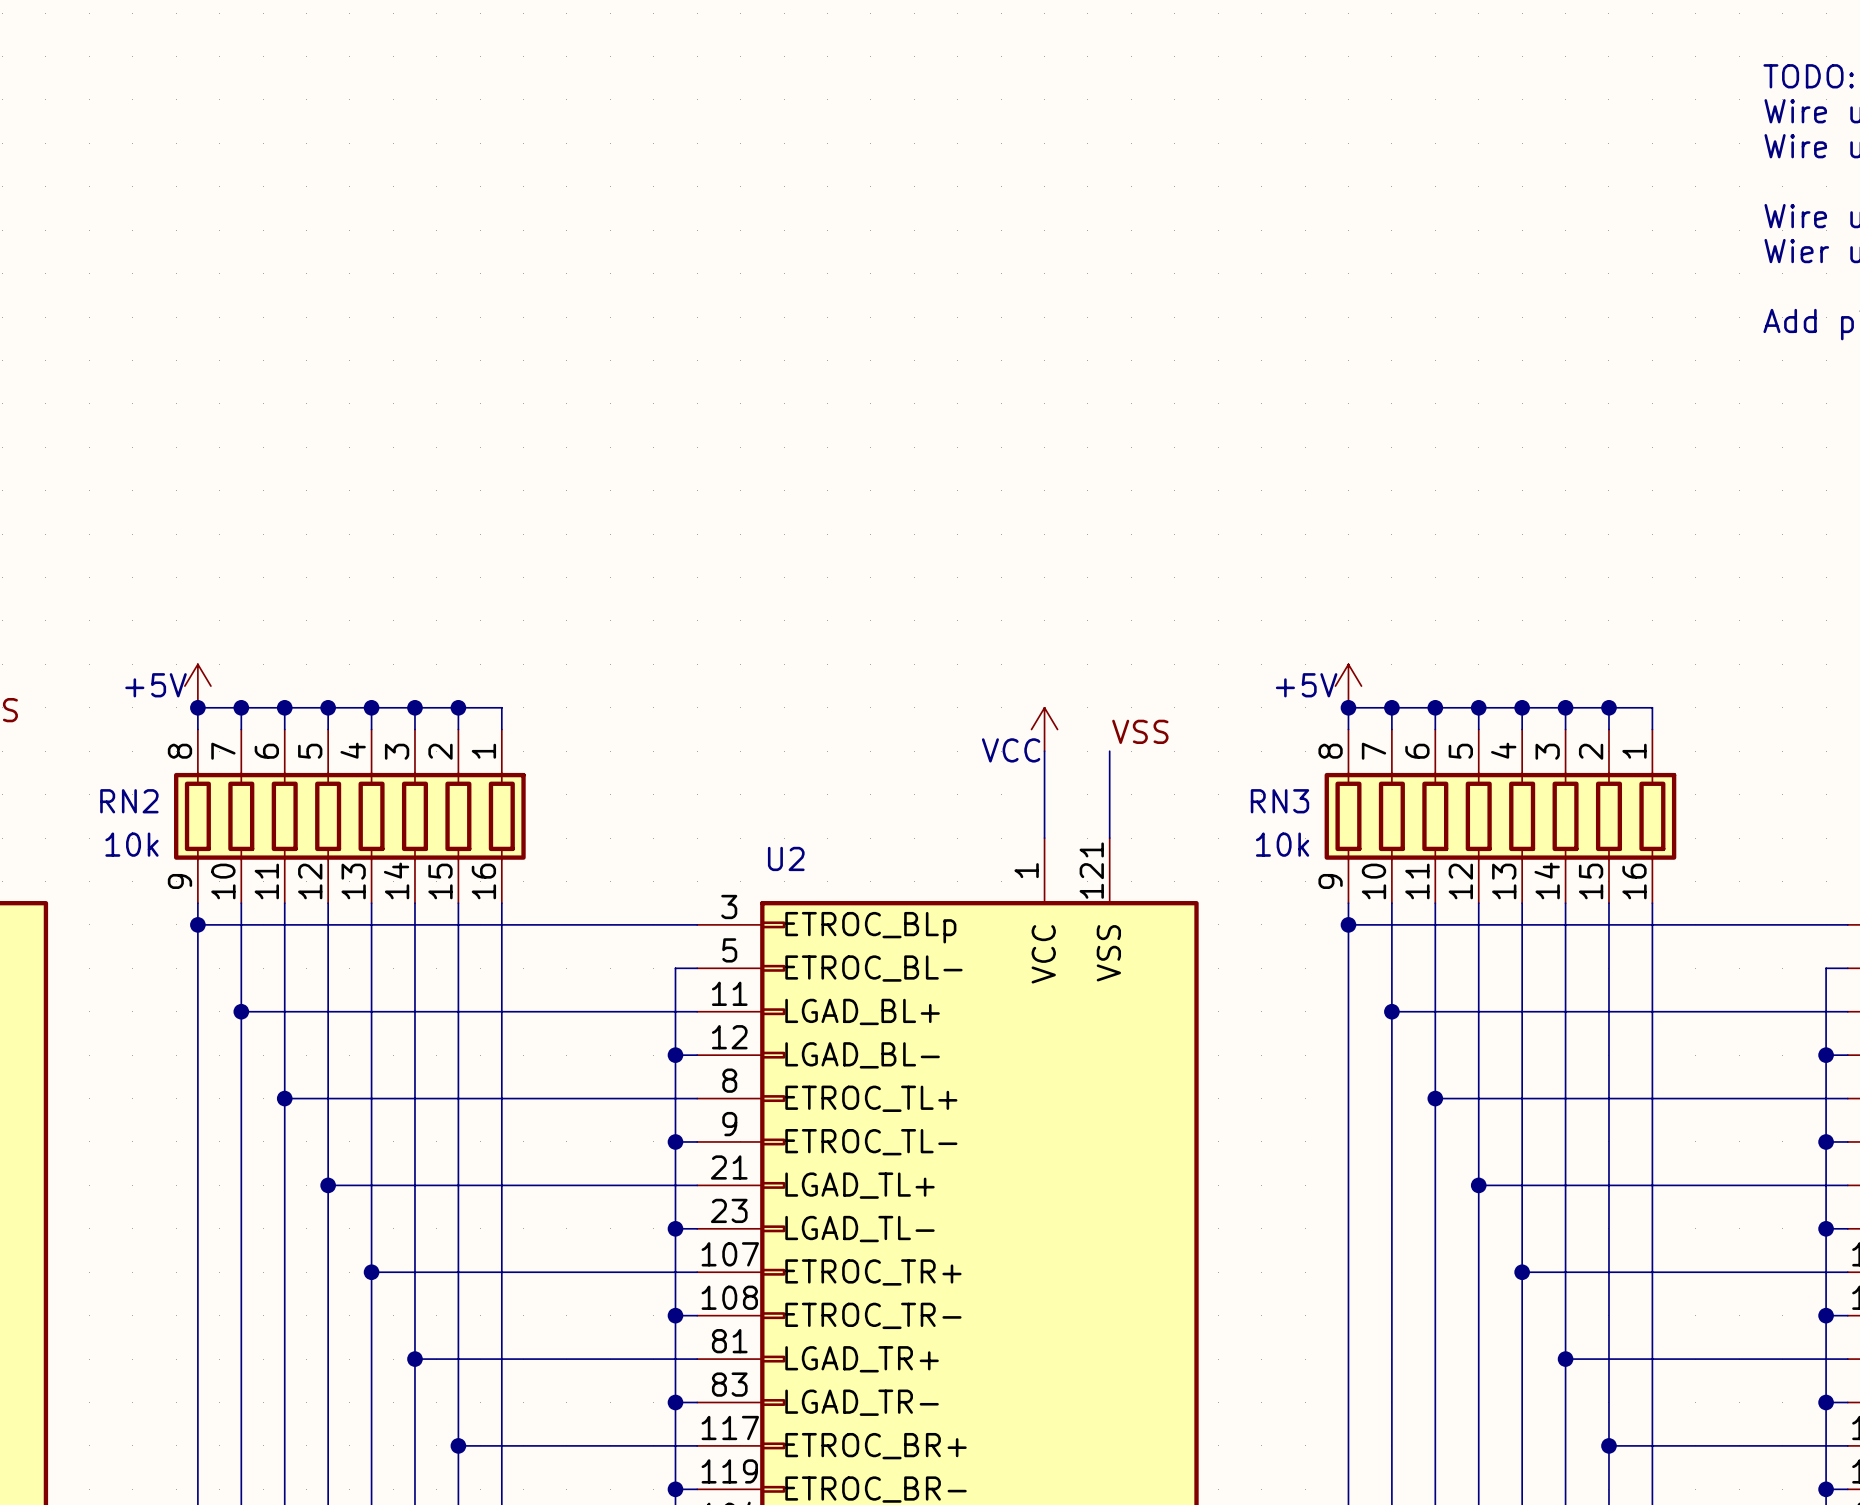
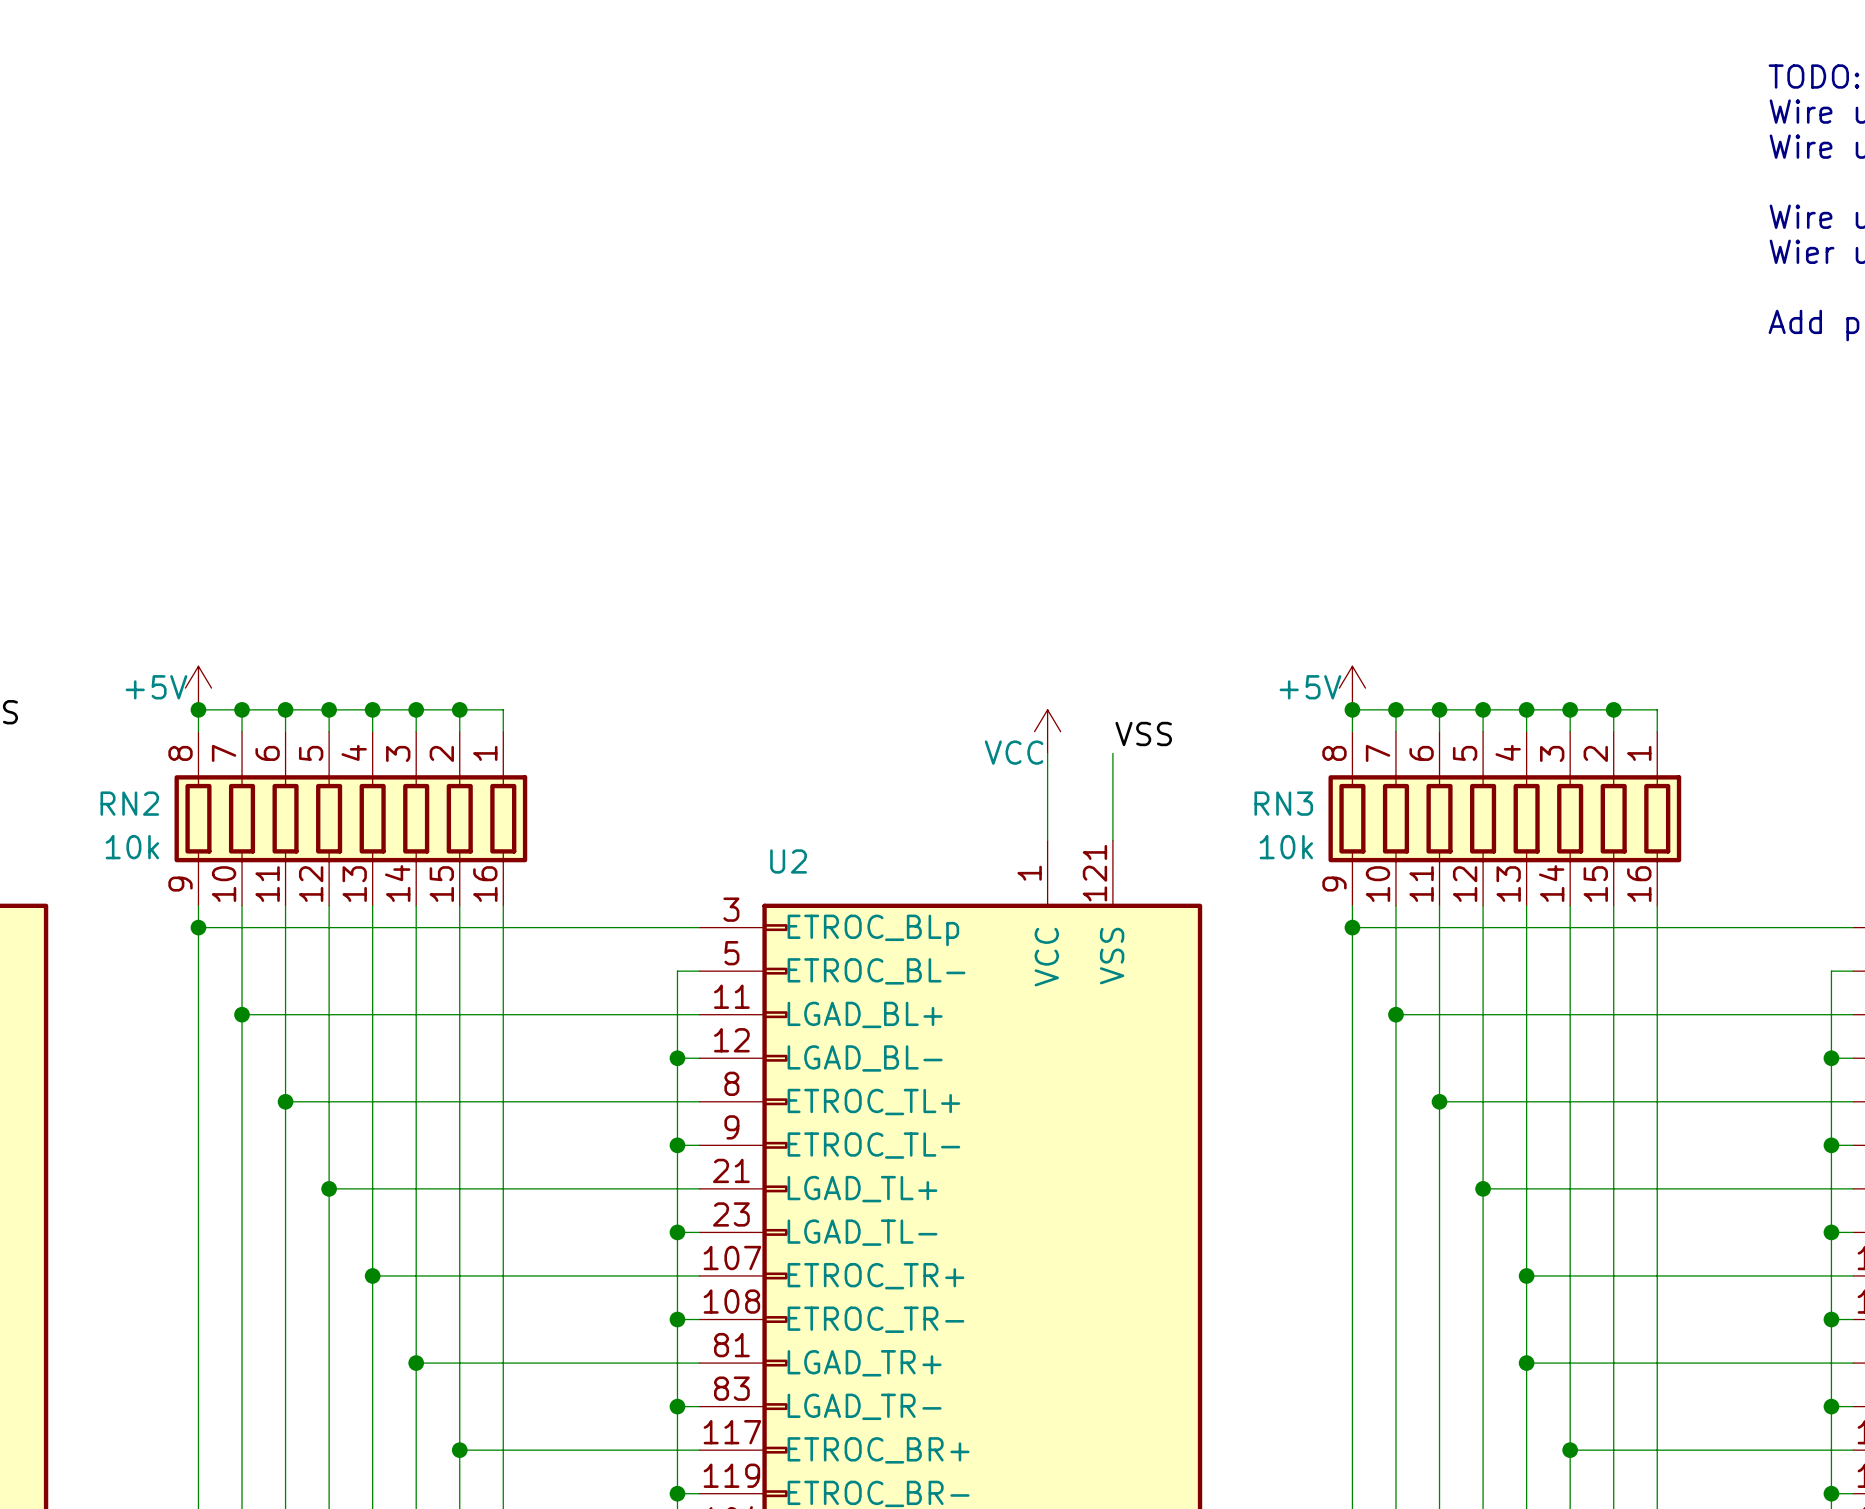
wire: none -> (1526, 1363) (1570, 1363)
junction: none -> (1526, 1363)
junction: (1565, 1359) -> none
wire: none -> (1570, 1450) (1613, 1450)
junction: none -> (1570, 1450)
junction: (1608, 1445) -> none

